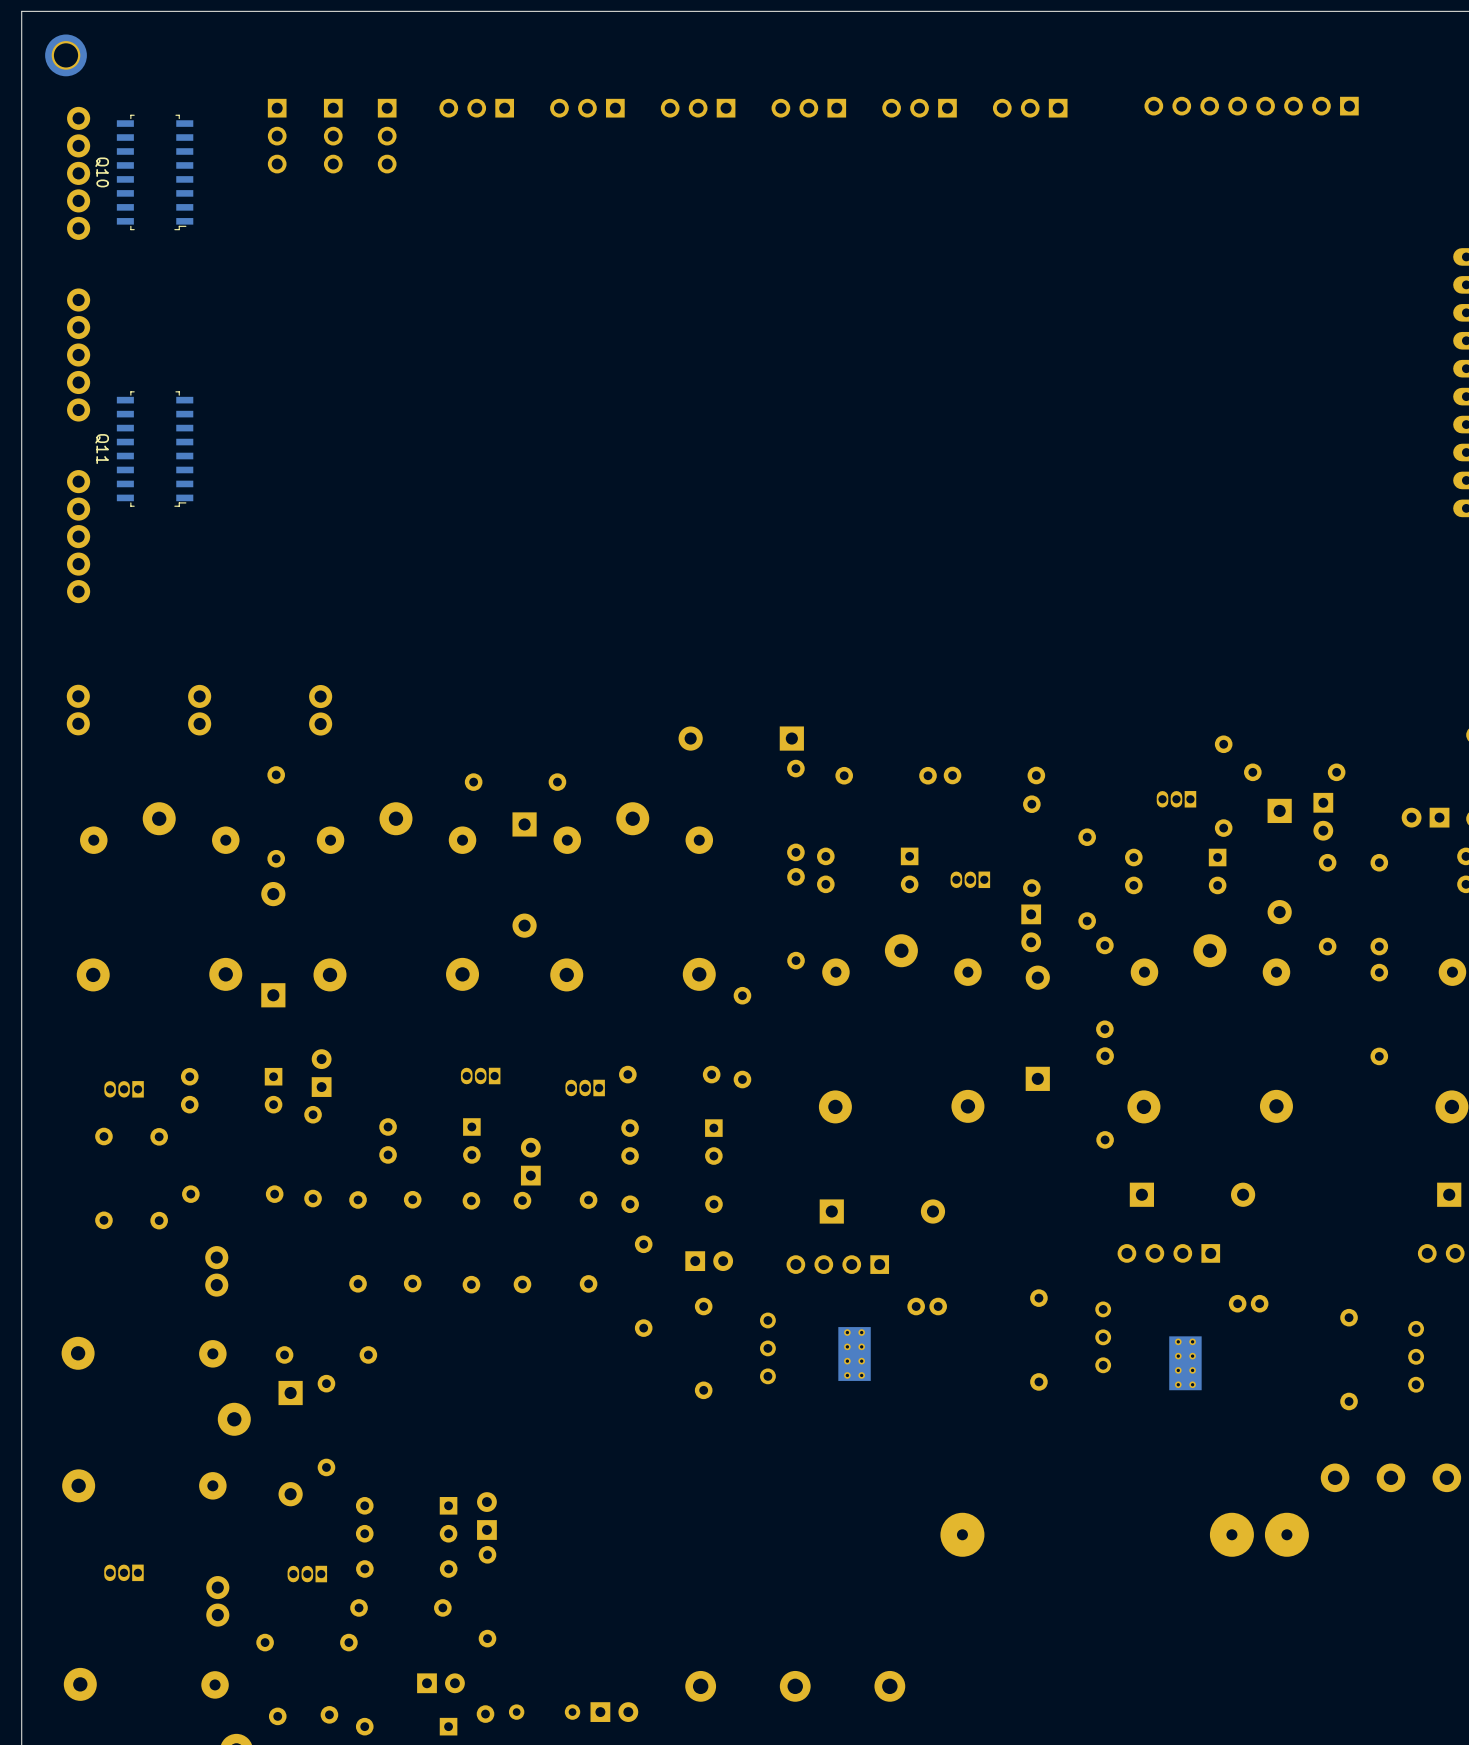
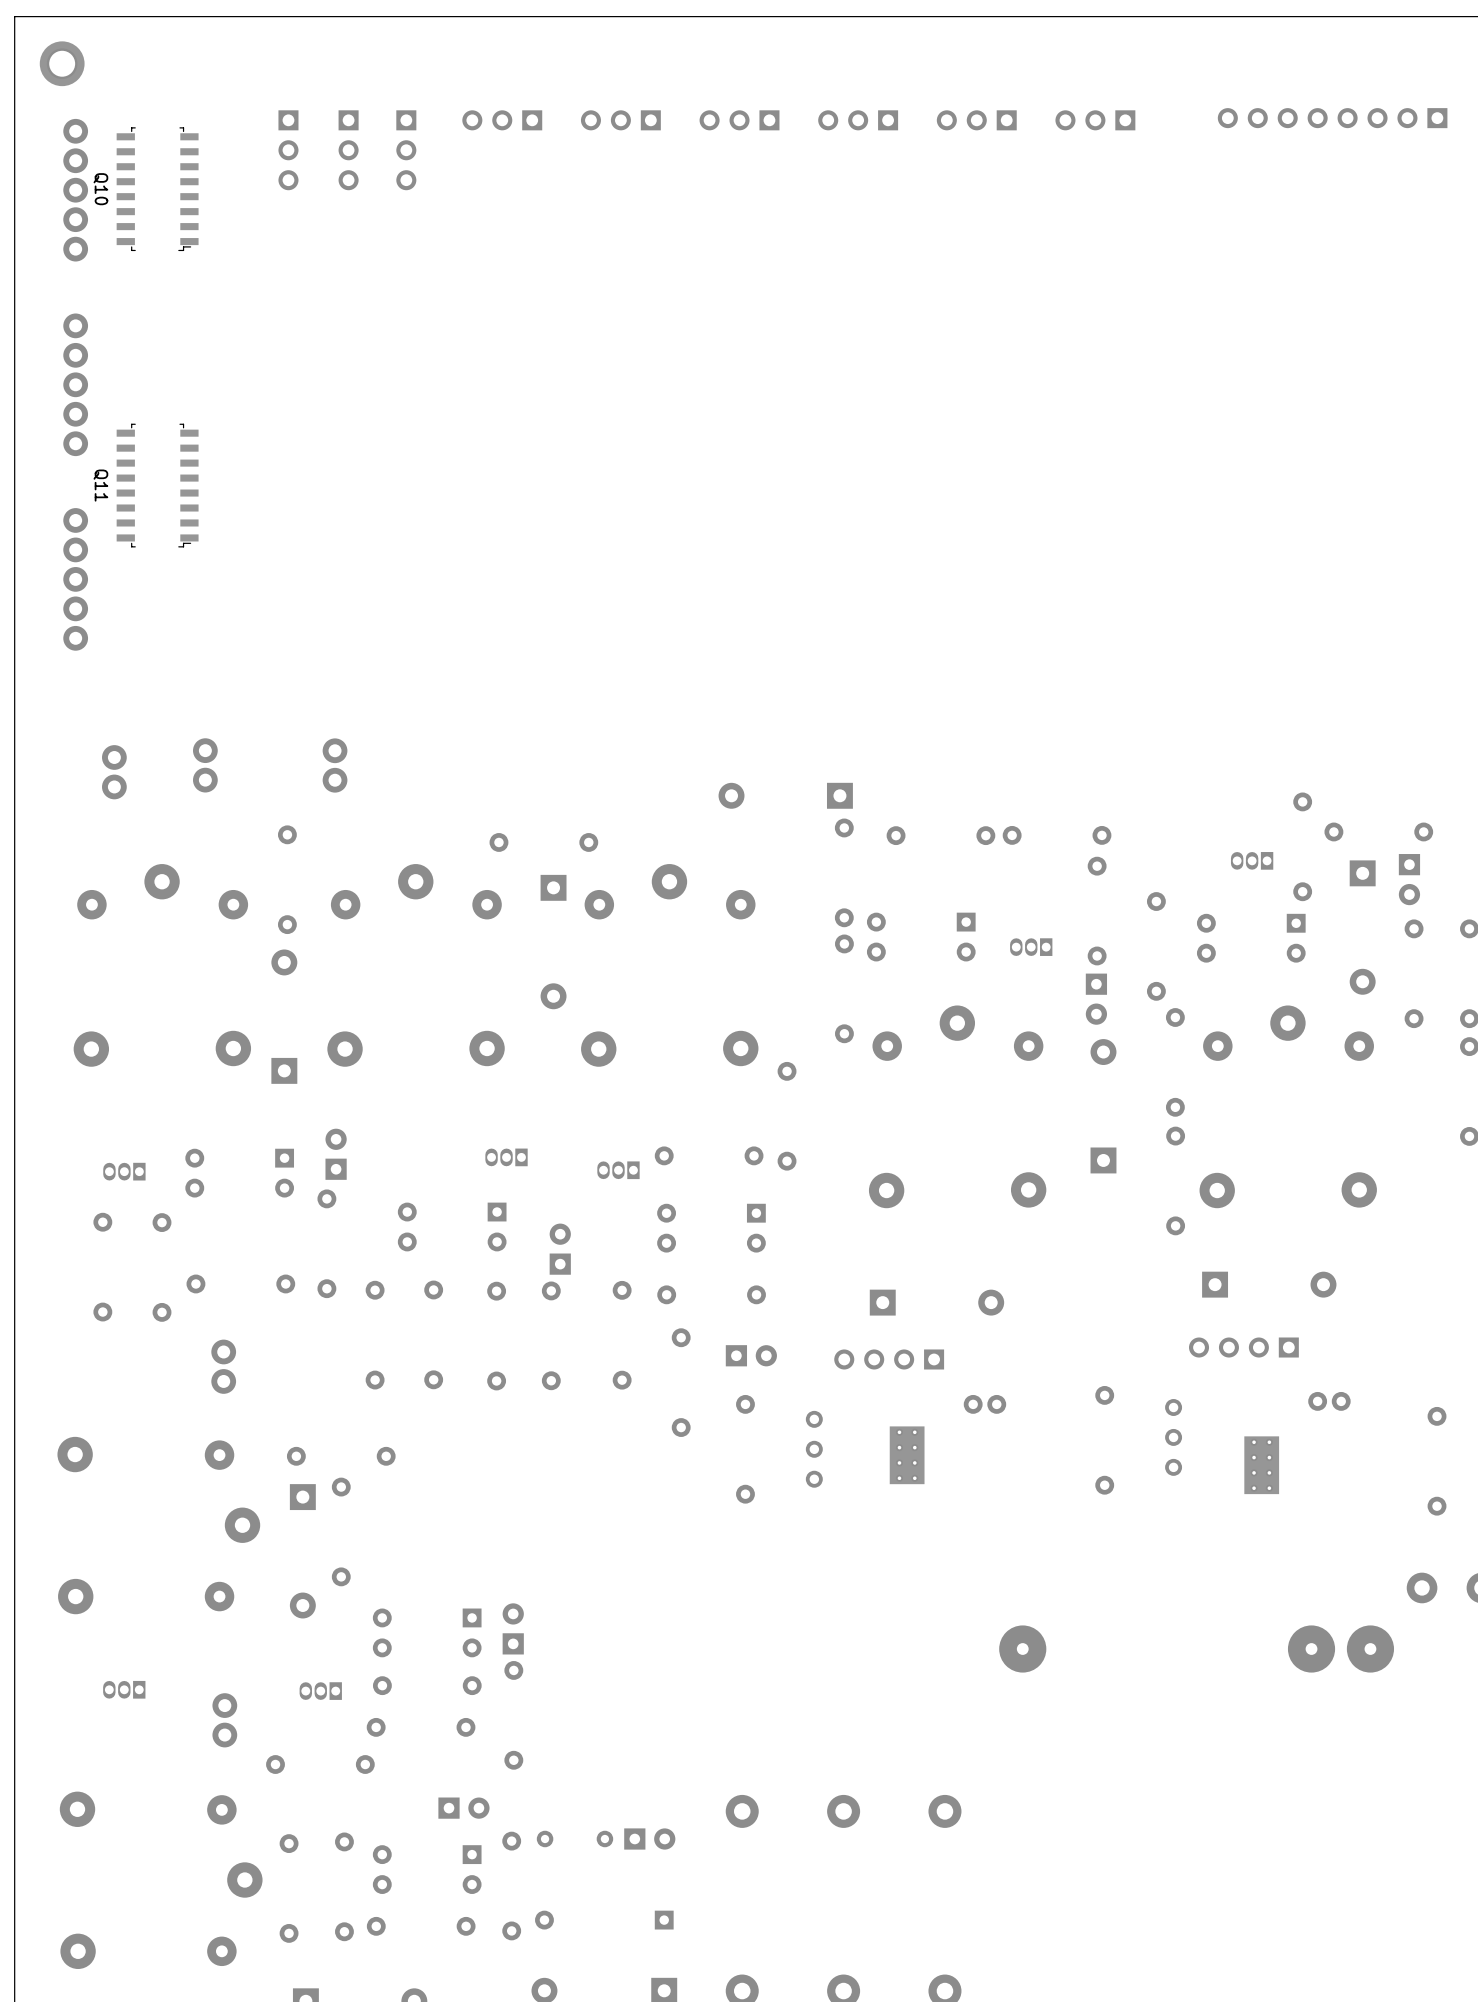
part position: (78, 710) -> (114, 772)

